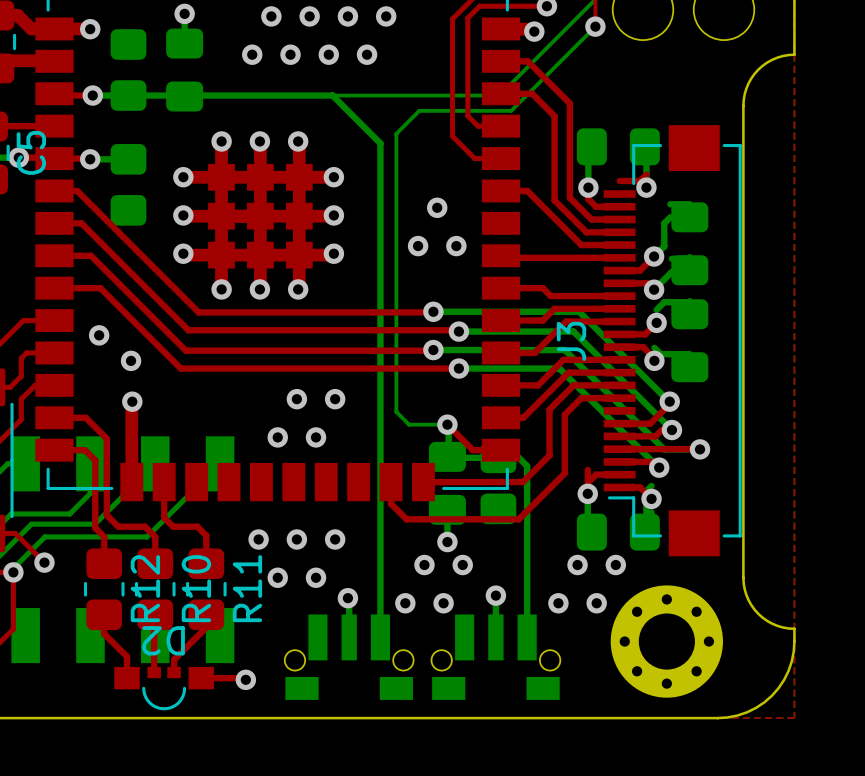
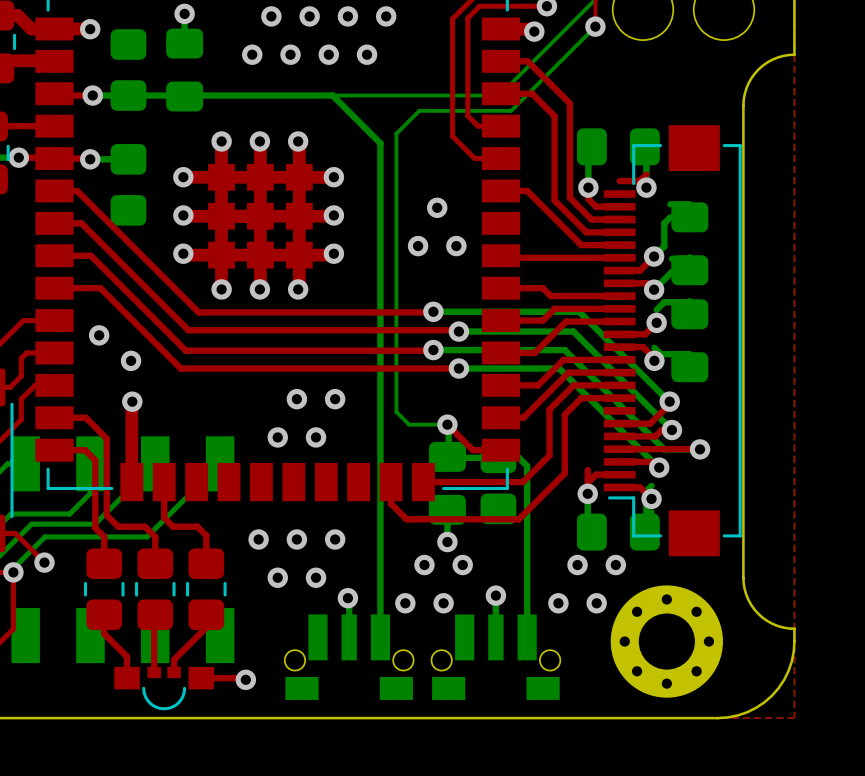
C5 name: C5 (31, 152) -> none
J3 name: J3 (571, 341) -> none
R12 name: R12 (145, 588) -> none
R10 name: R10 (196, 588) -> none
R11 name: R11 (247, 588) -> none
D2 name: D2 (163, 640) -> none

